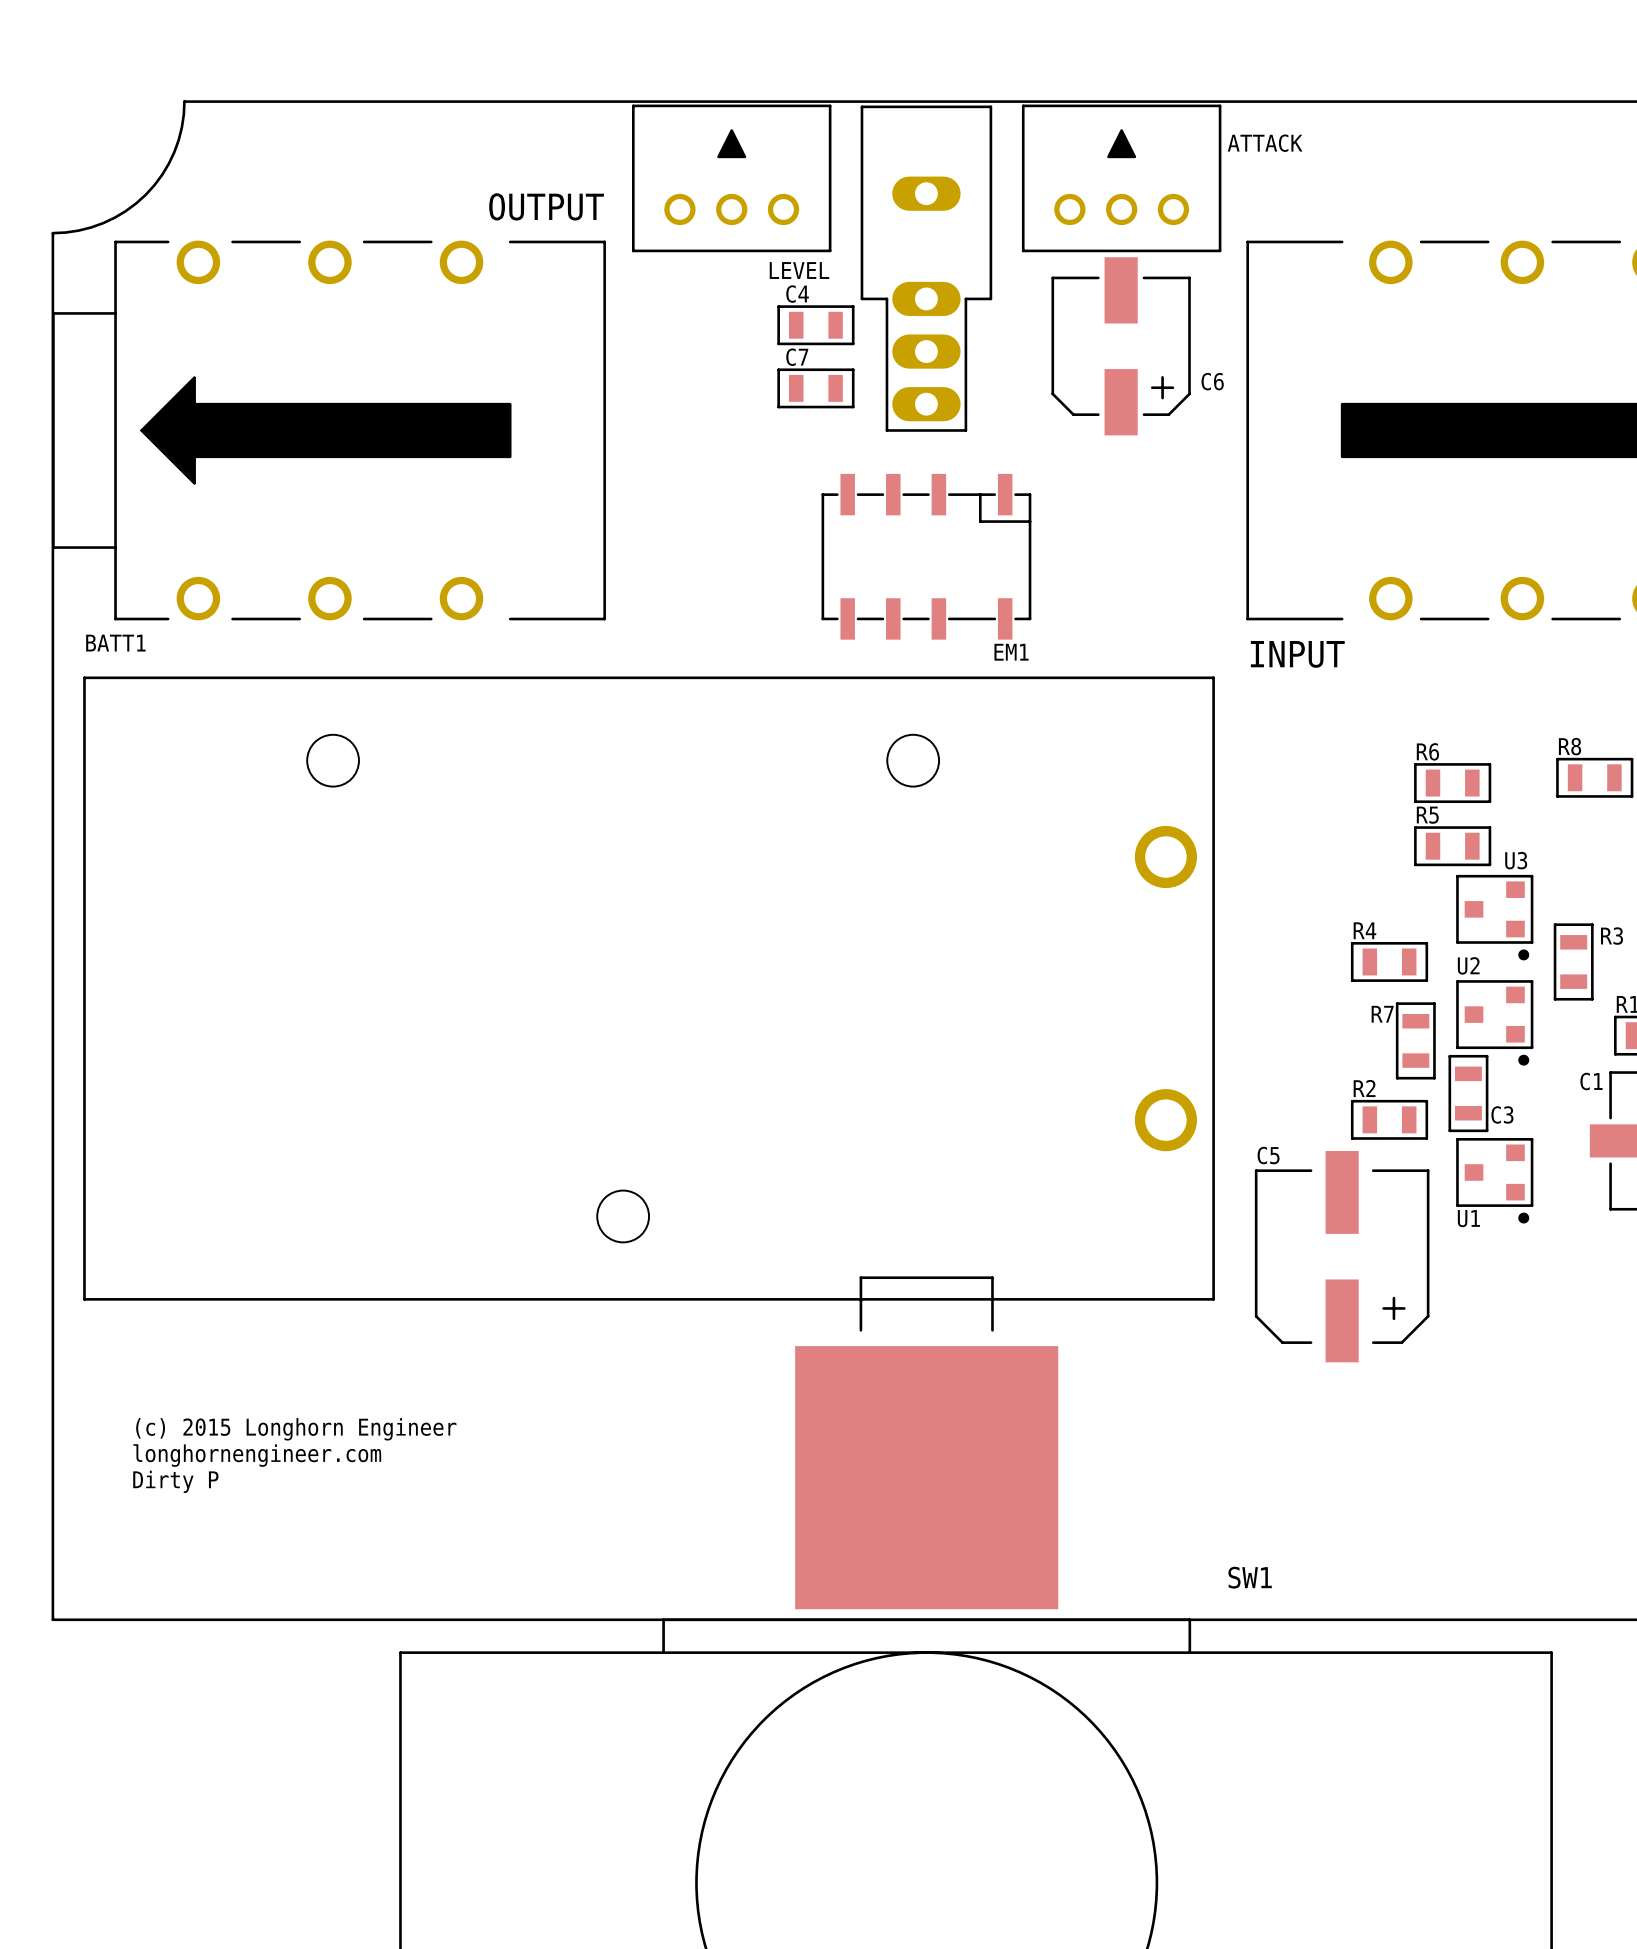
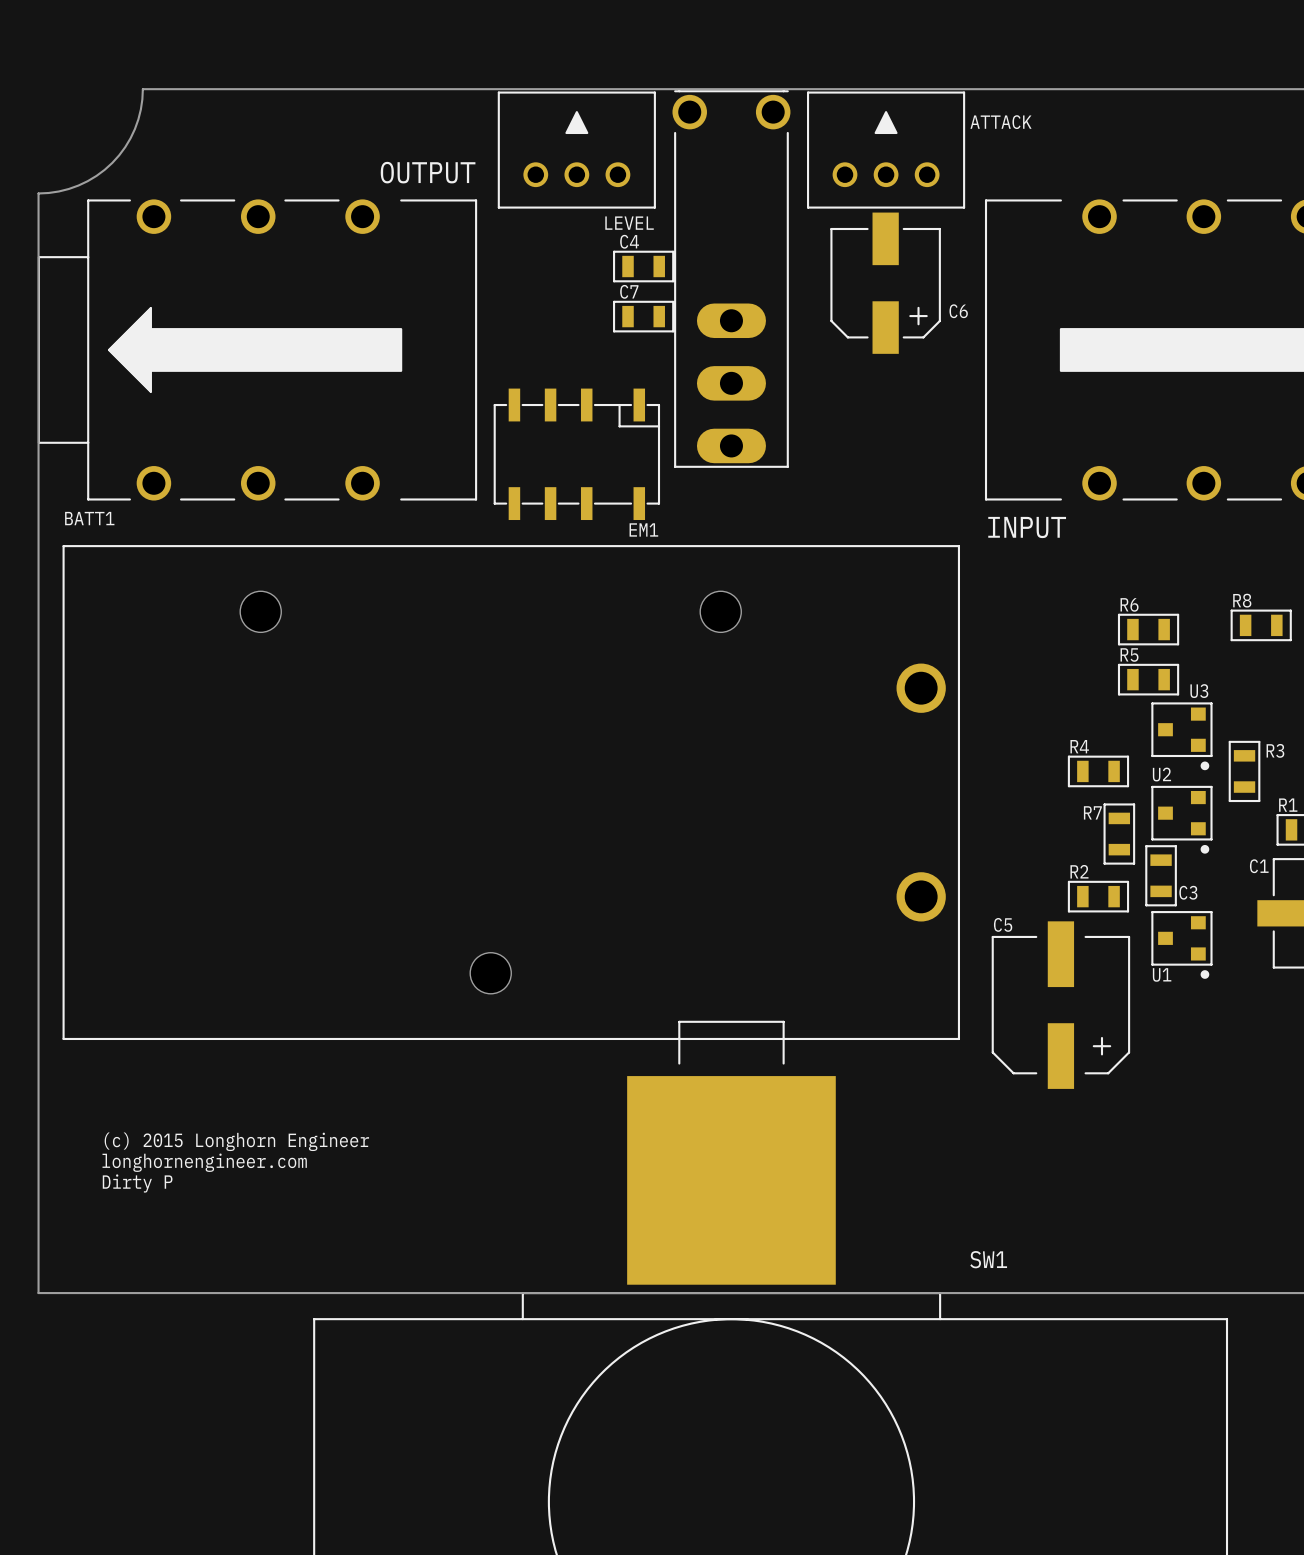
part: (926, 268) -> none
part: none -> (731, 279)
EM1 position: (926, 556) -> (576, 454)

